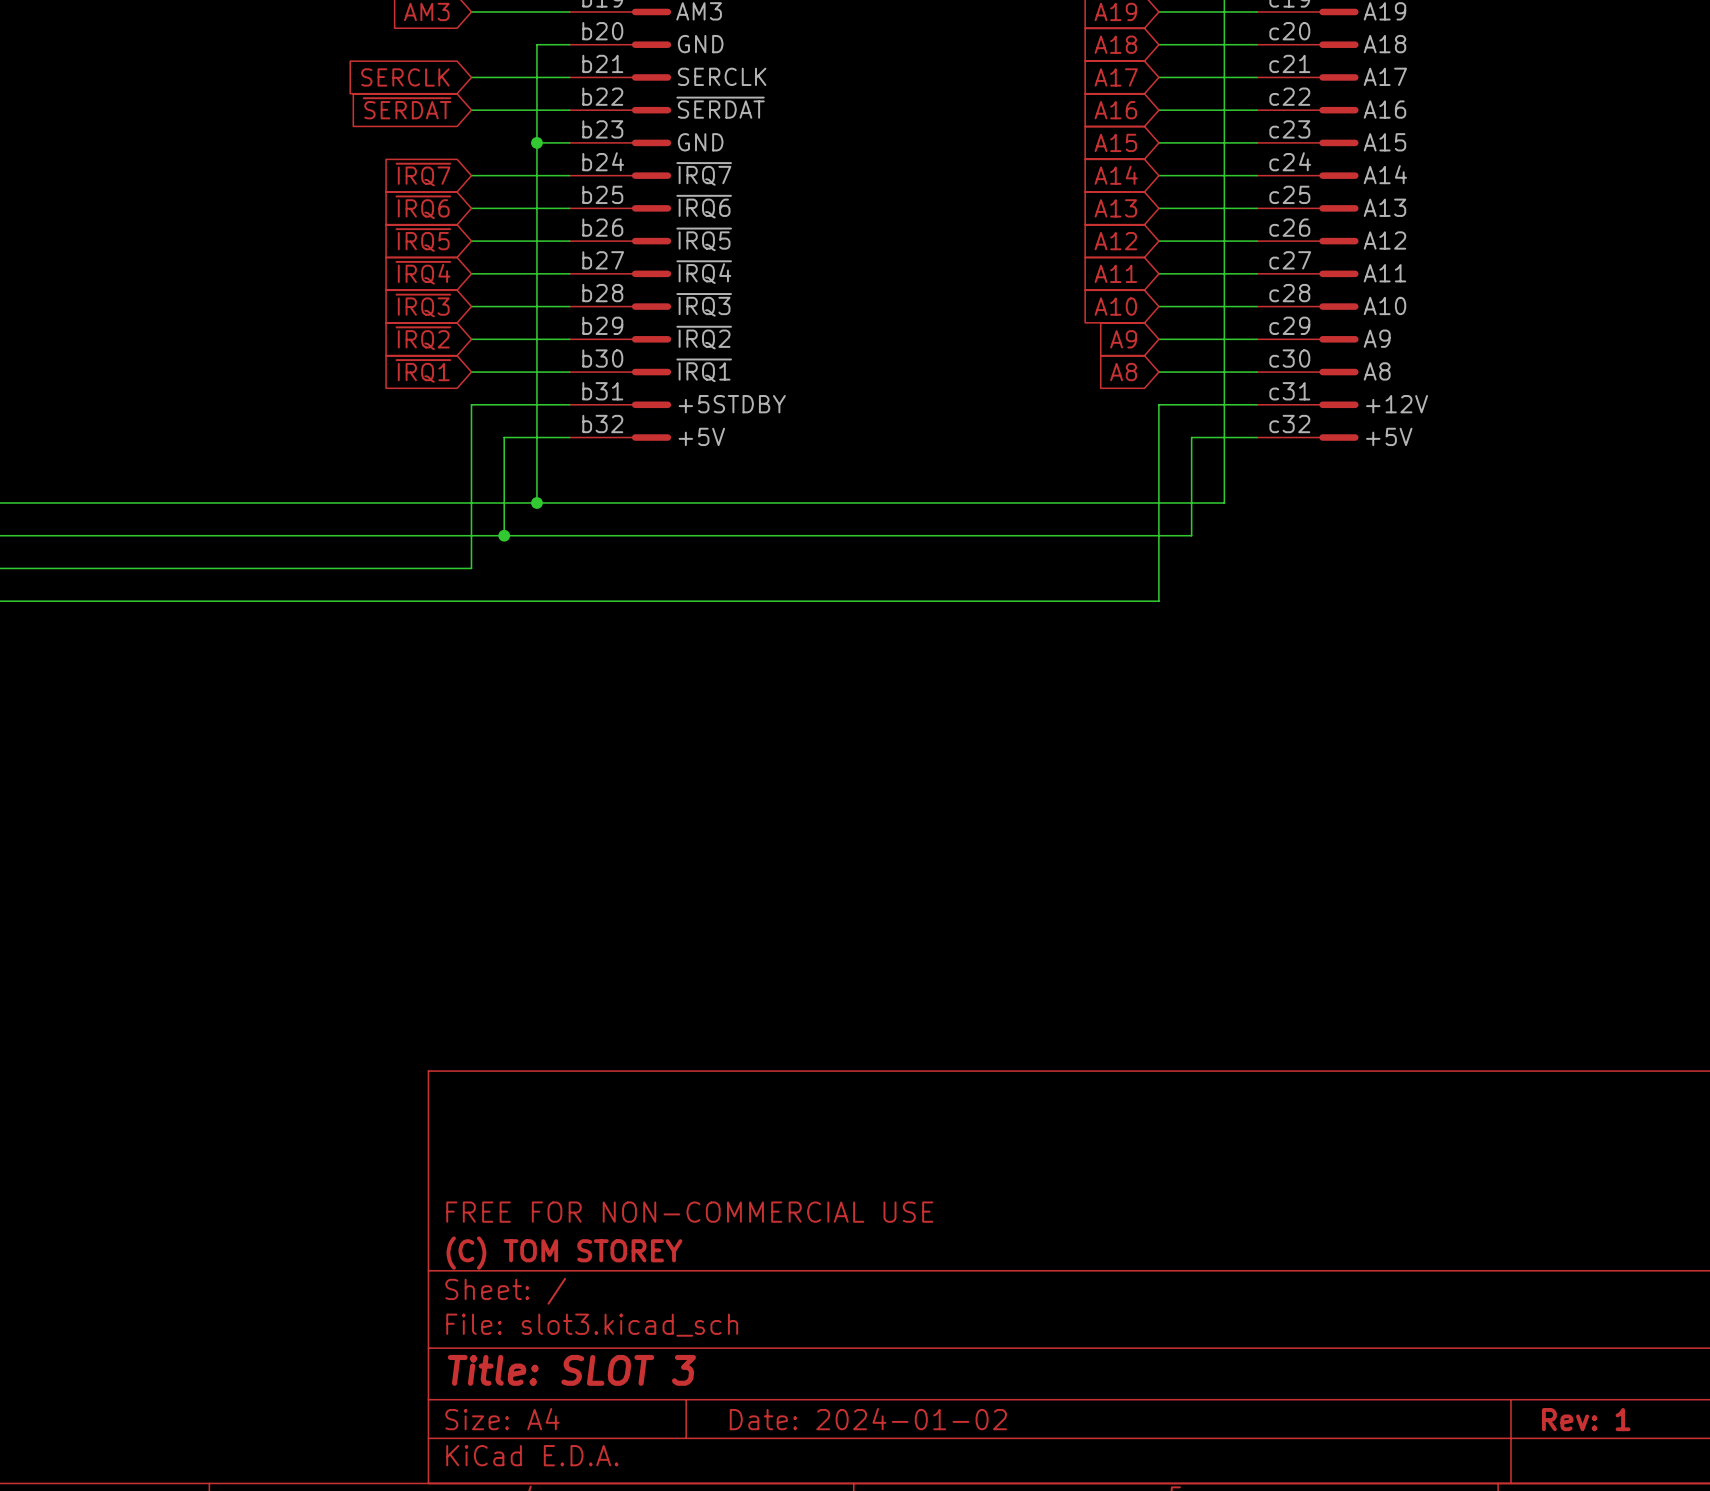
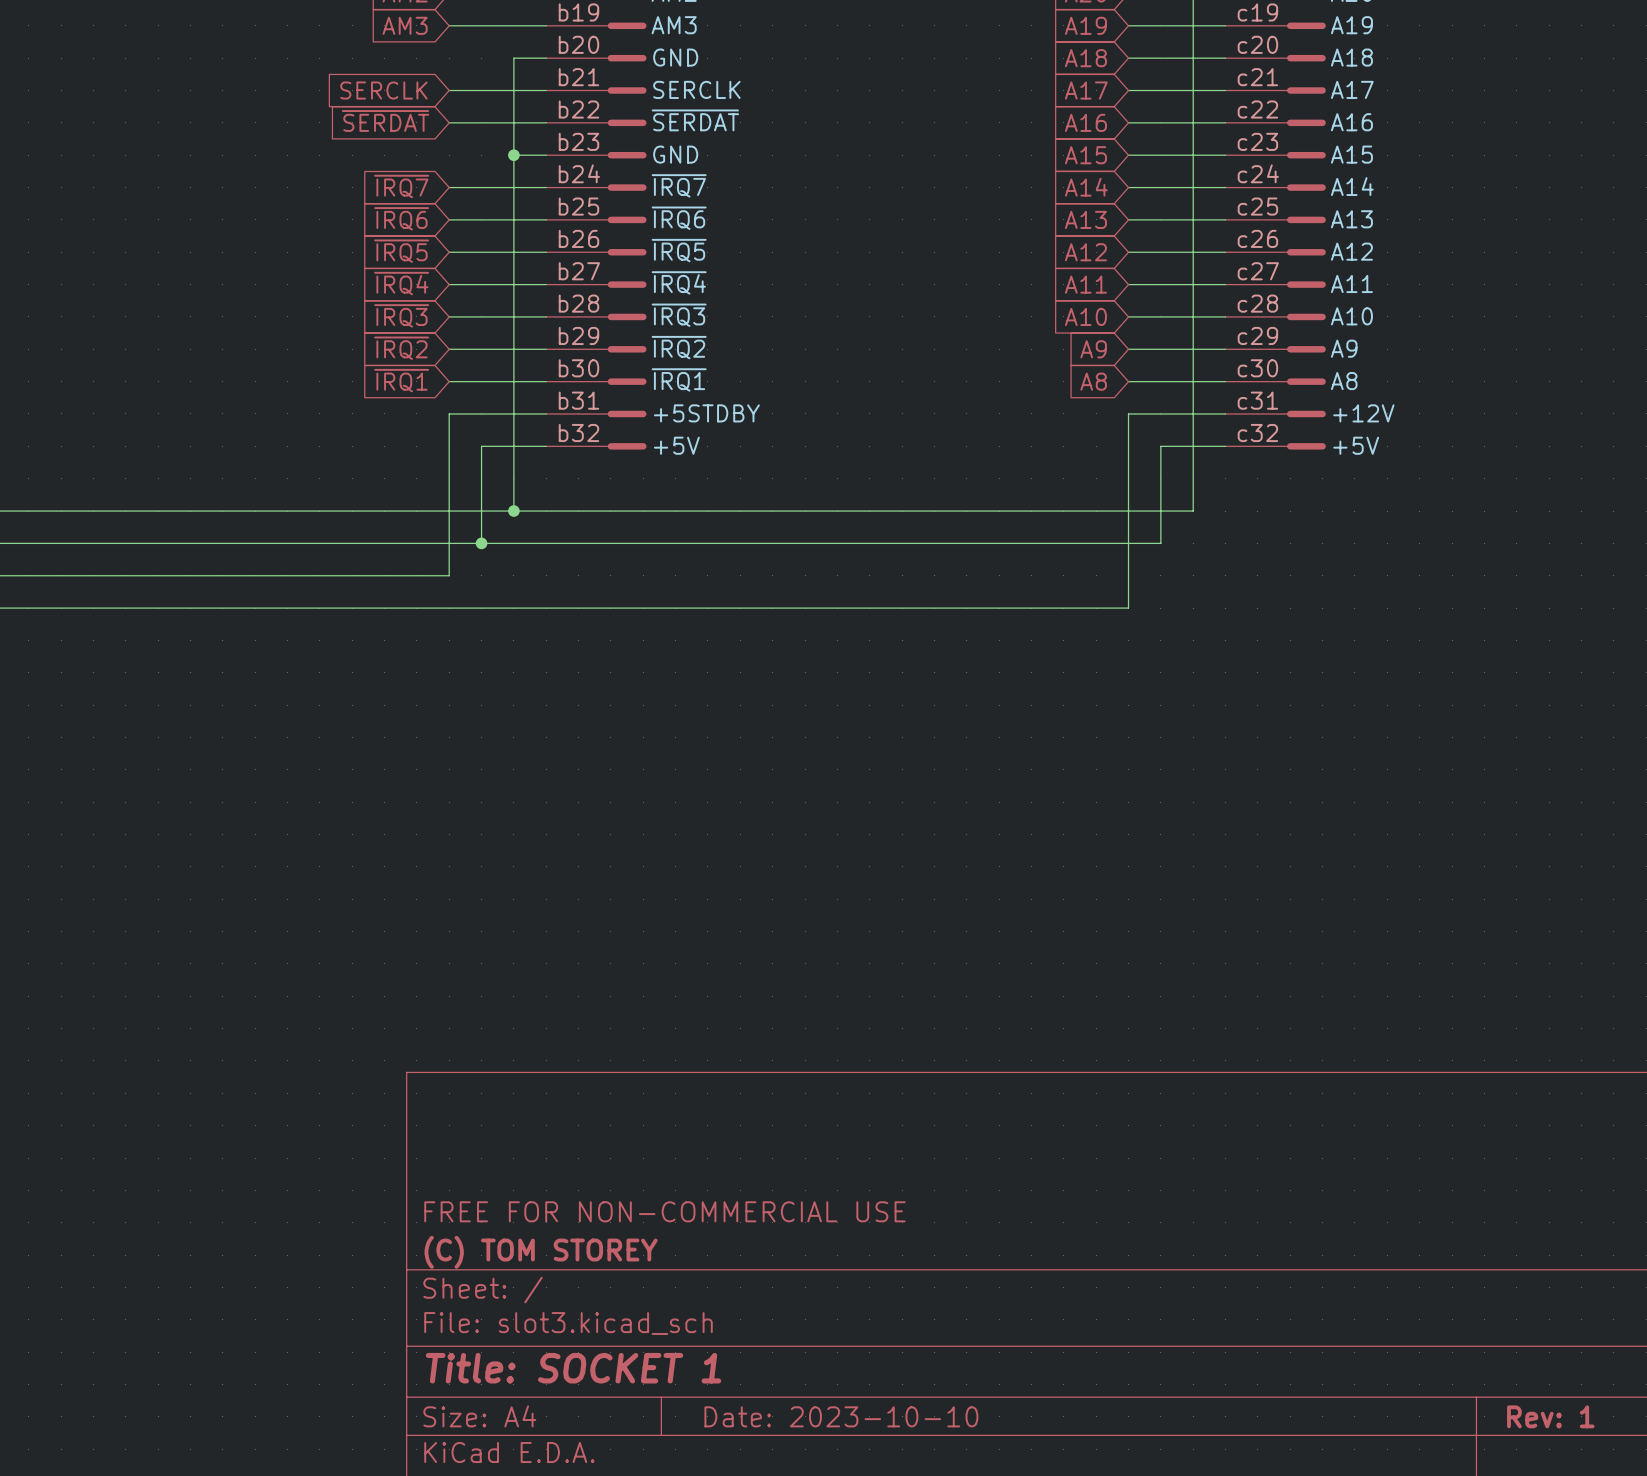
title block: Title: SLOT 3 (571, 1370) -> Title: SOCKET 1 (573, 1368)
title block: Date: 2024-01-02 (868, 1419) -> Date: 2023-10-10 (841, 1416)

